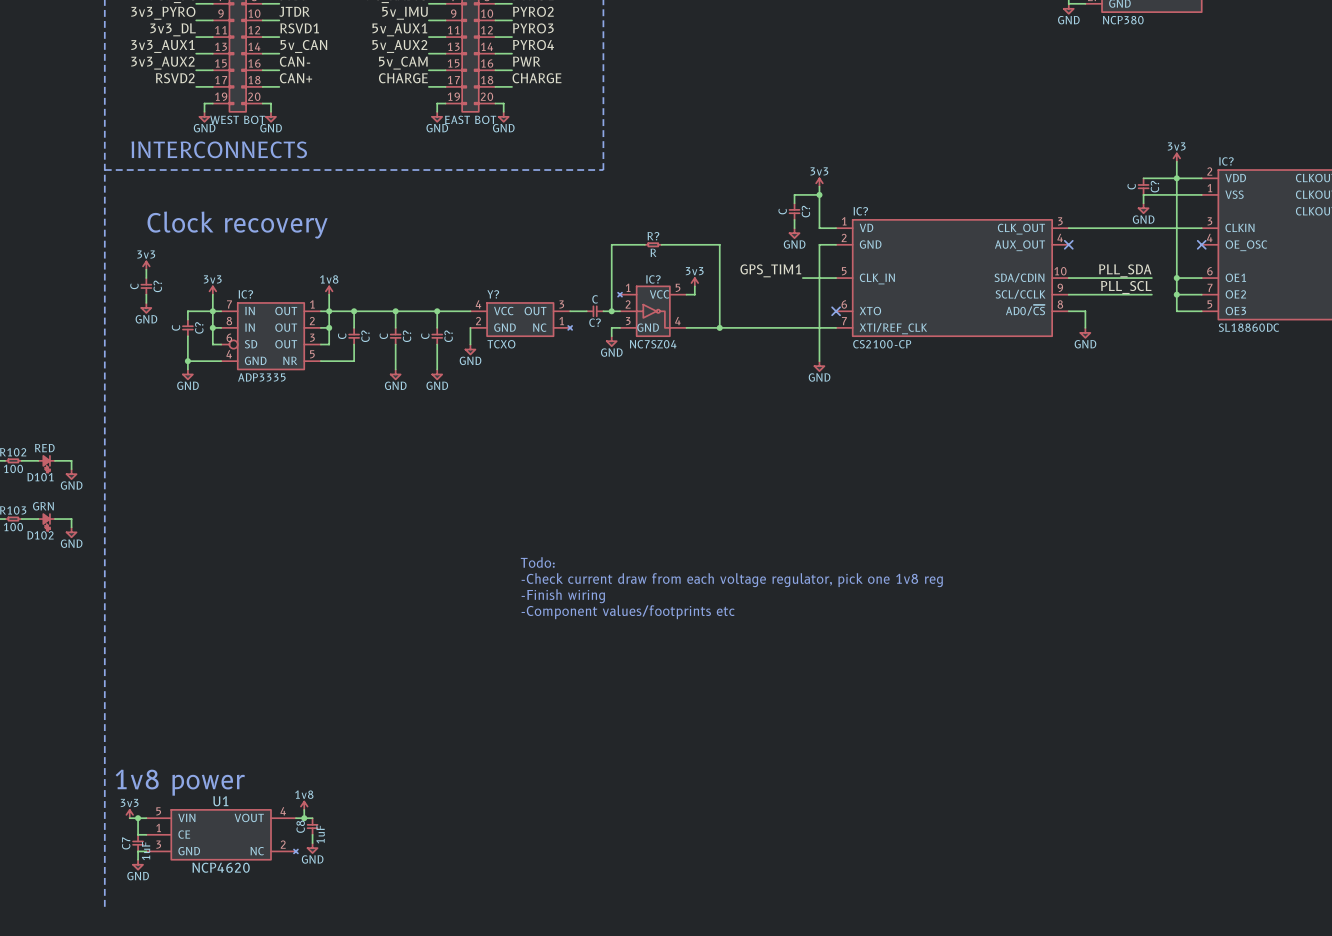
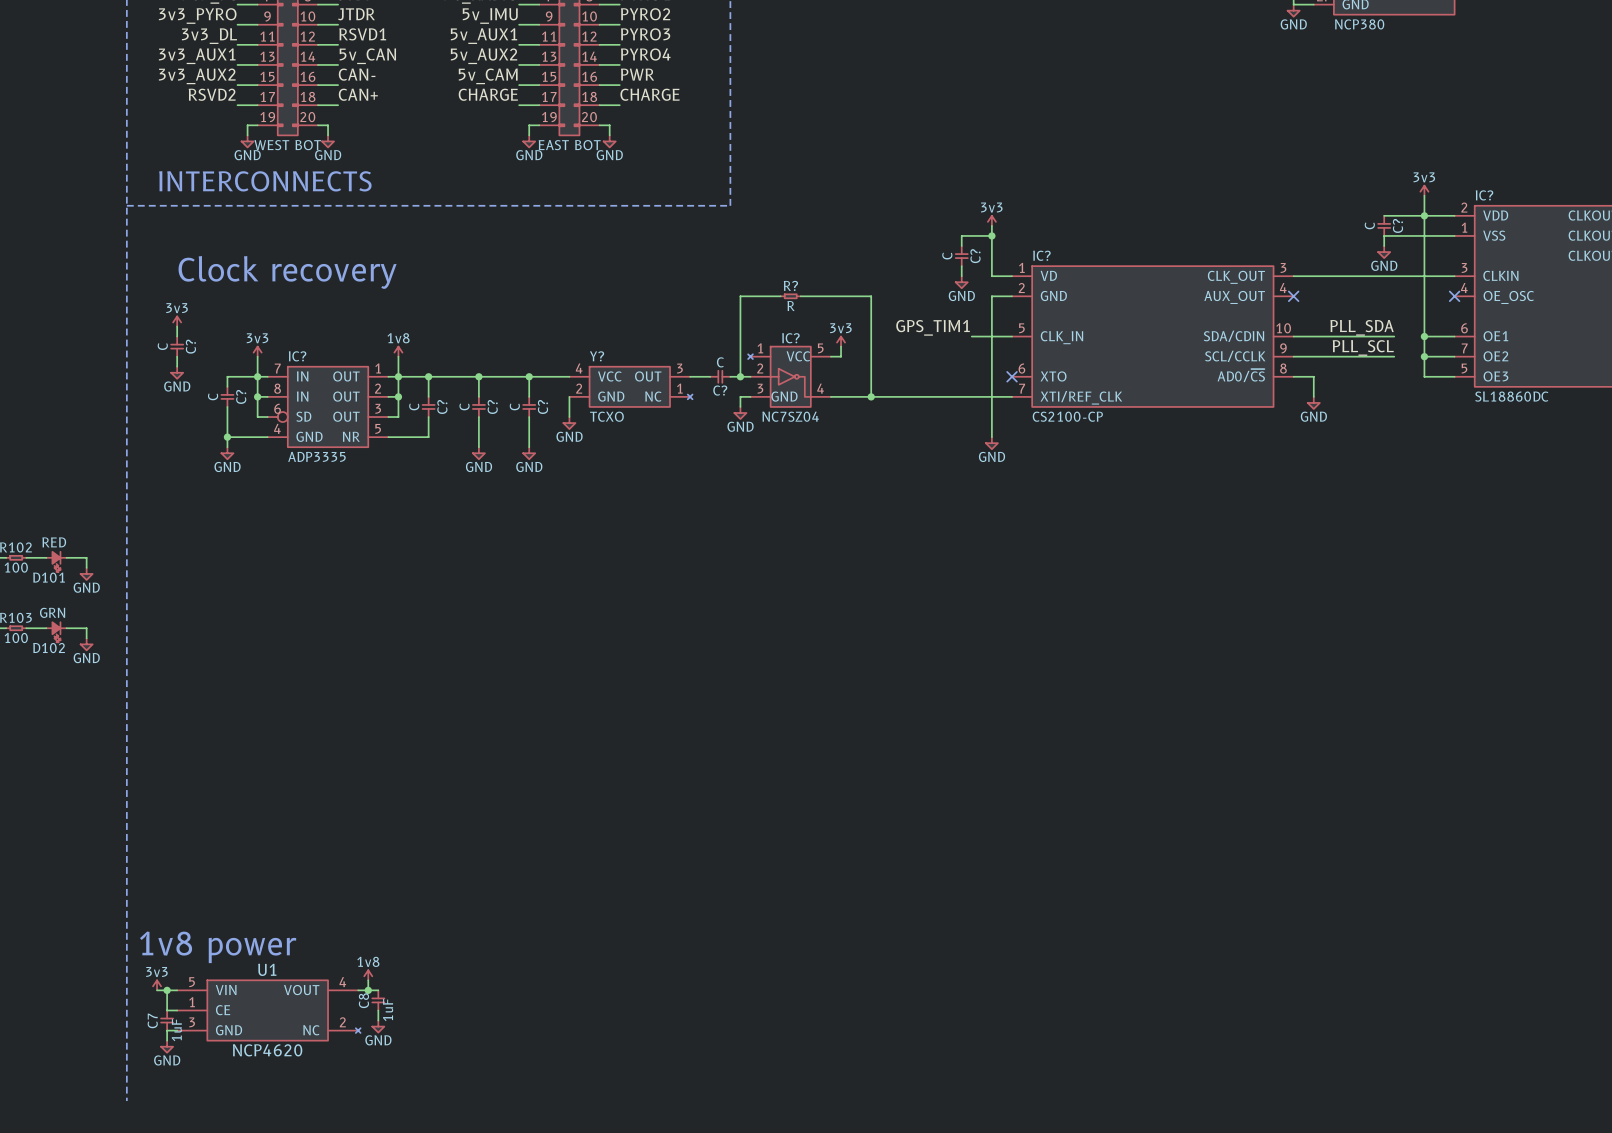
text: Todo: (537, 562) -> none
text: -Check current draw from each voltage regulator, pick one 1v8 reg (732, 580) -> none
text: -Finish wiring (563, 596) -> none
text: -Component values/footprints etc (628, 612) -> none

